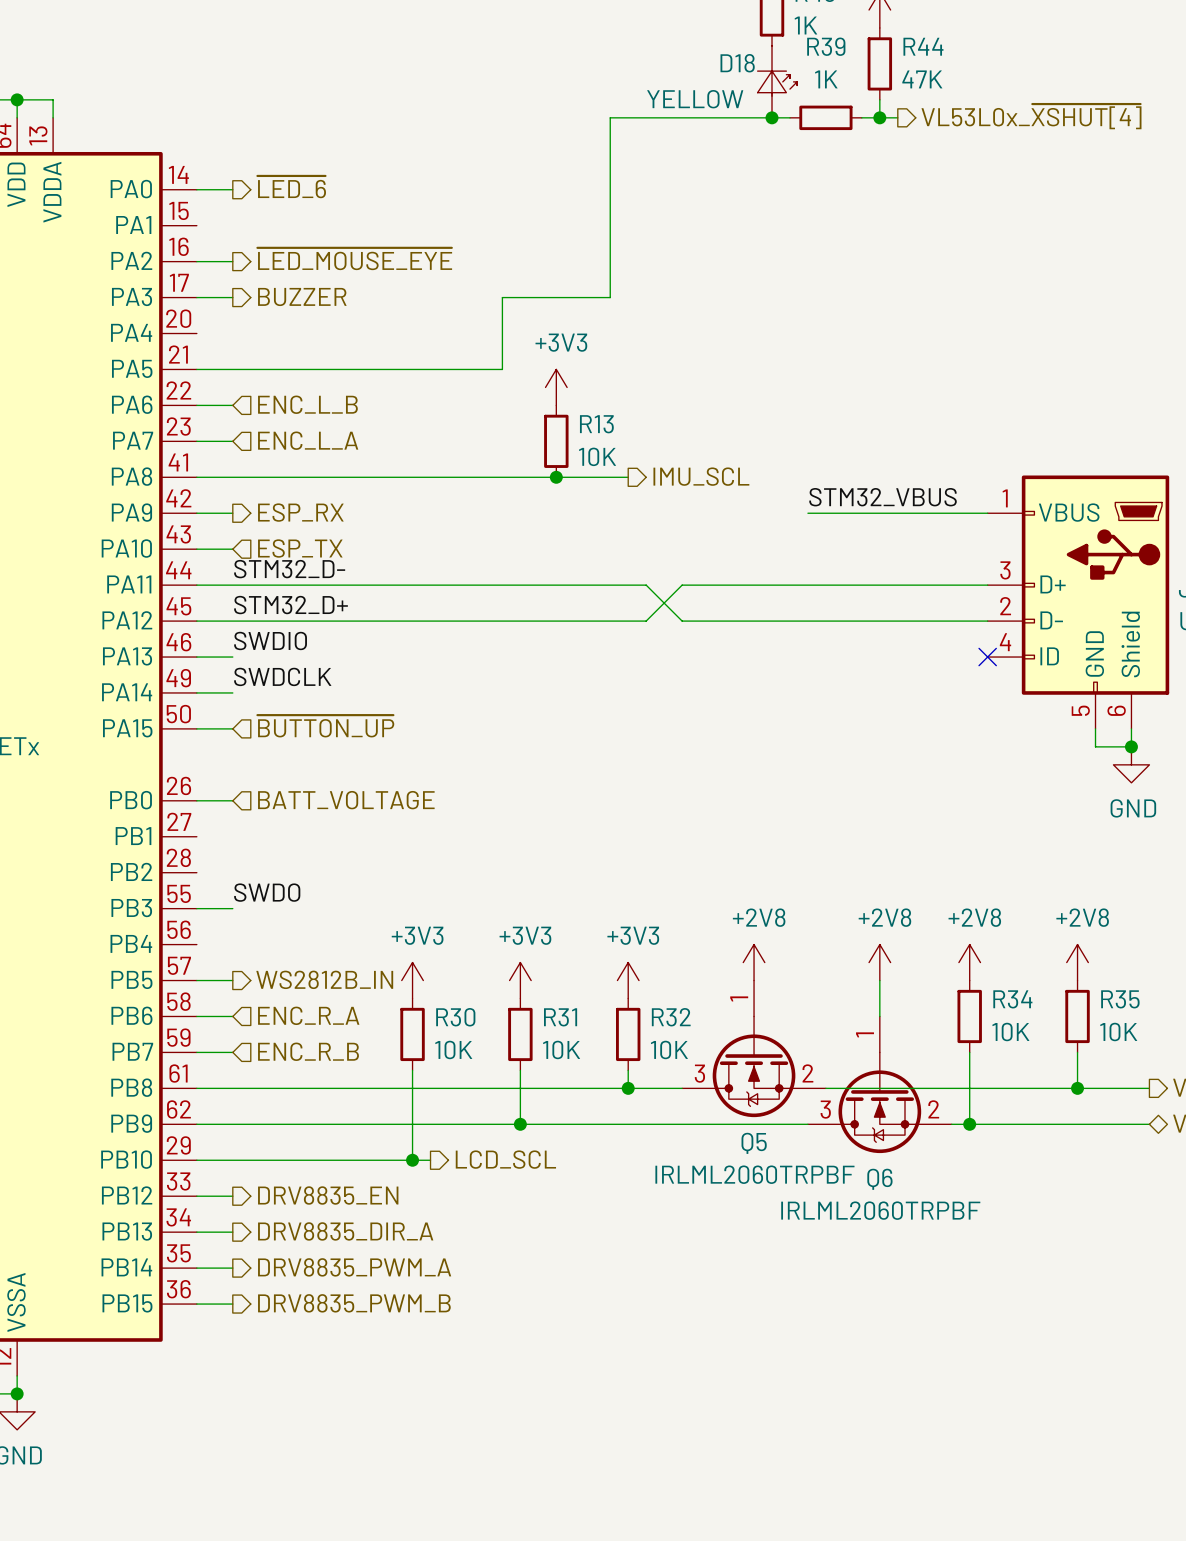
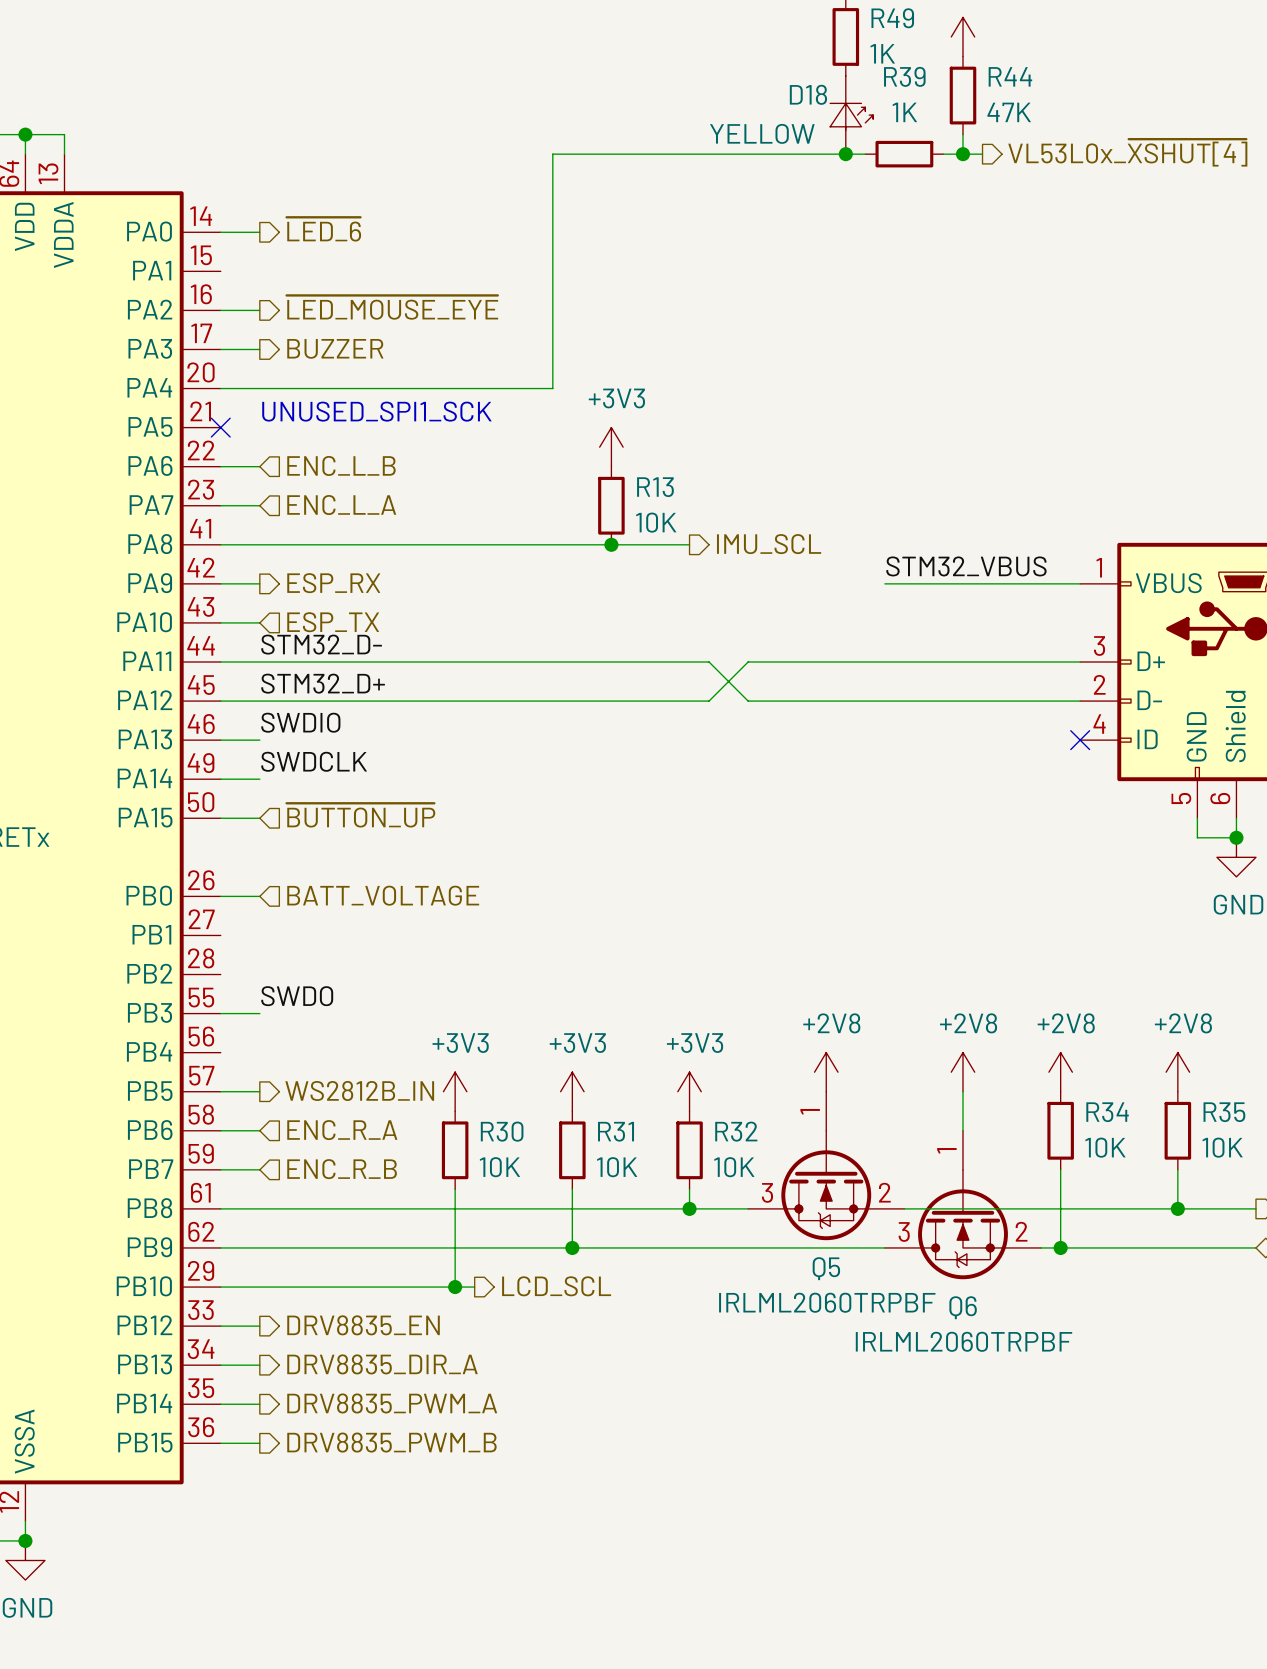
wire: (610, 117) (610, 297) (502, 297) -> (670, 154) (552, 154) (552, 349)
wire: (502, 333) (502, 369) (196, 369) -> (552, 388) (220, 388)
text: none -> UNUSED_SPI1_SCK (376, 411)
no-connect mark: none -> (220, 427)

